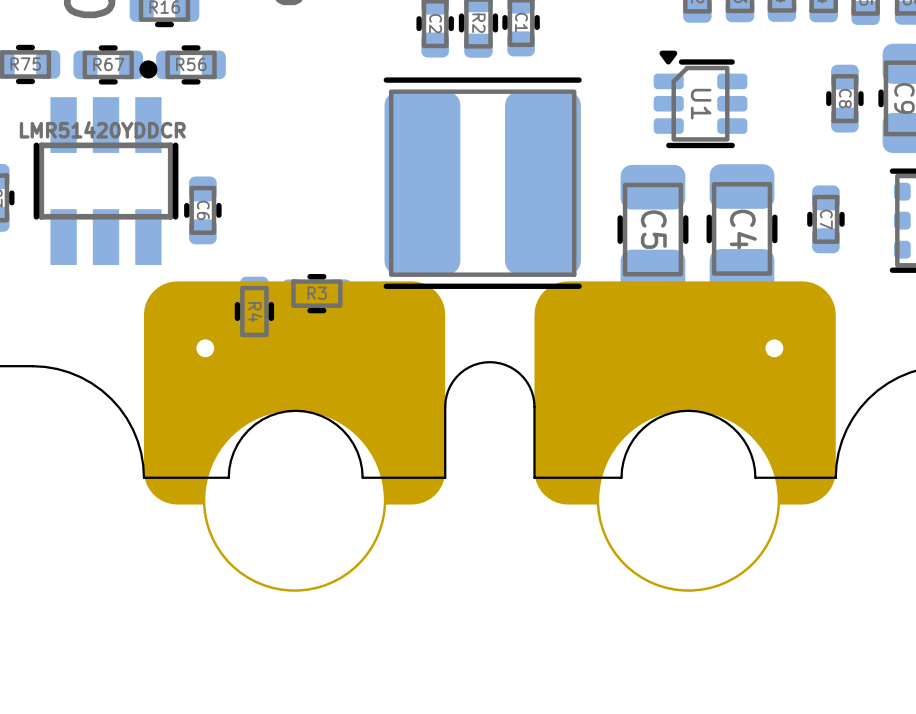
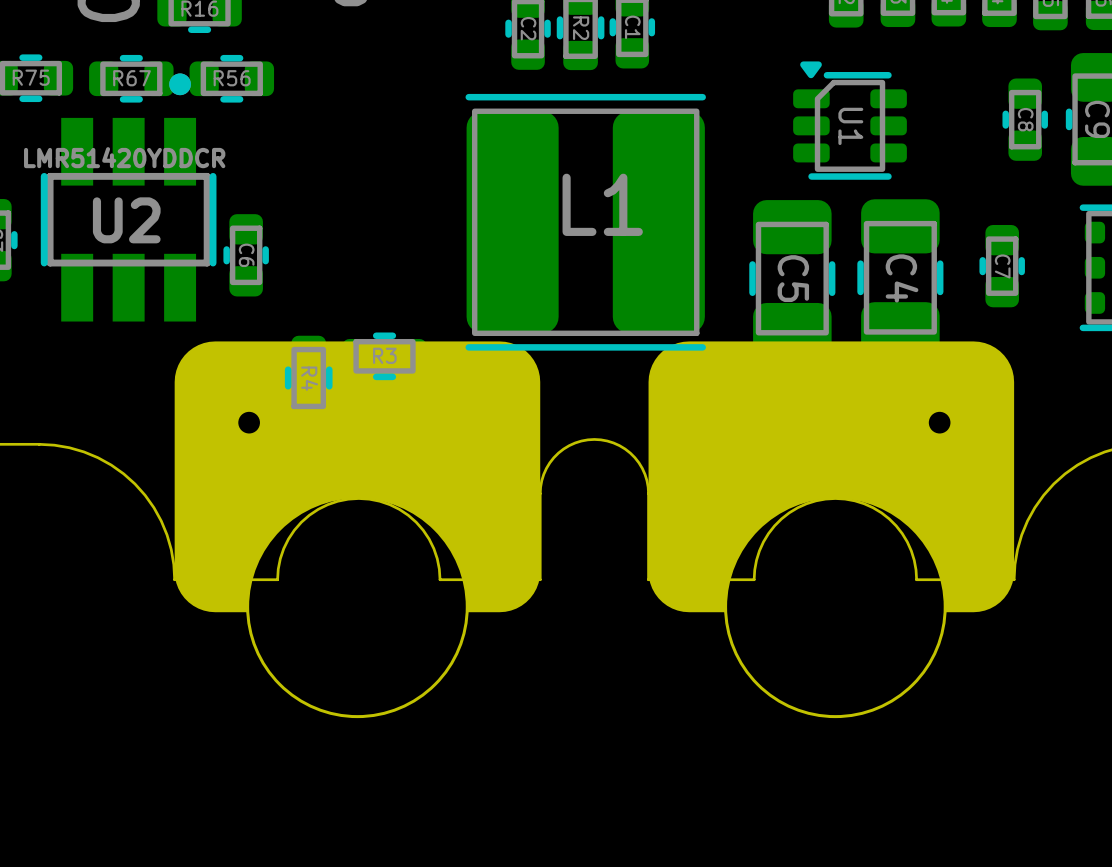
text: none -> L1 (602, 204)
text: none -> U2 (126, 220)

